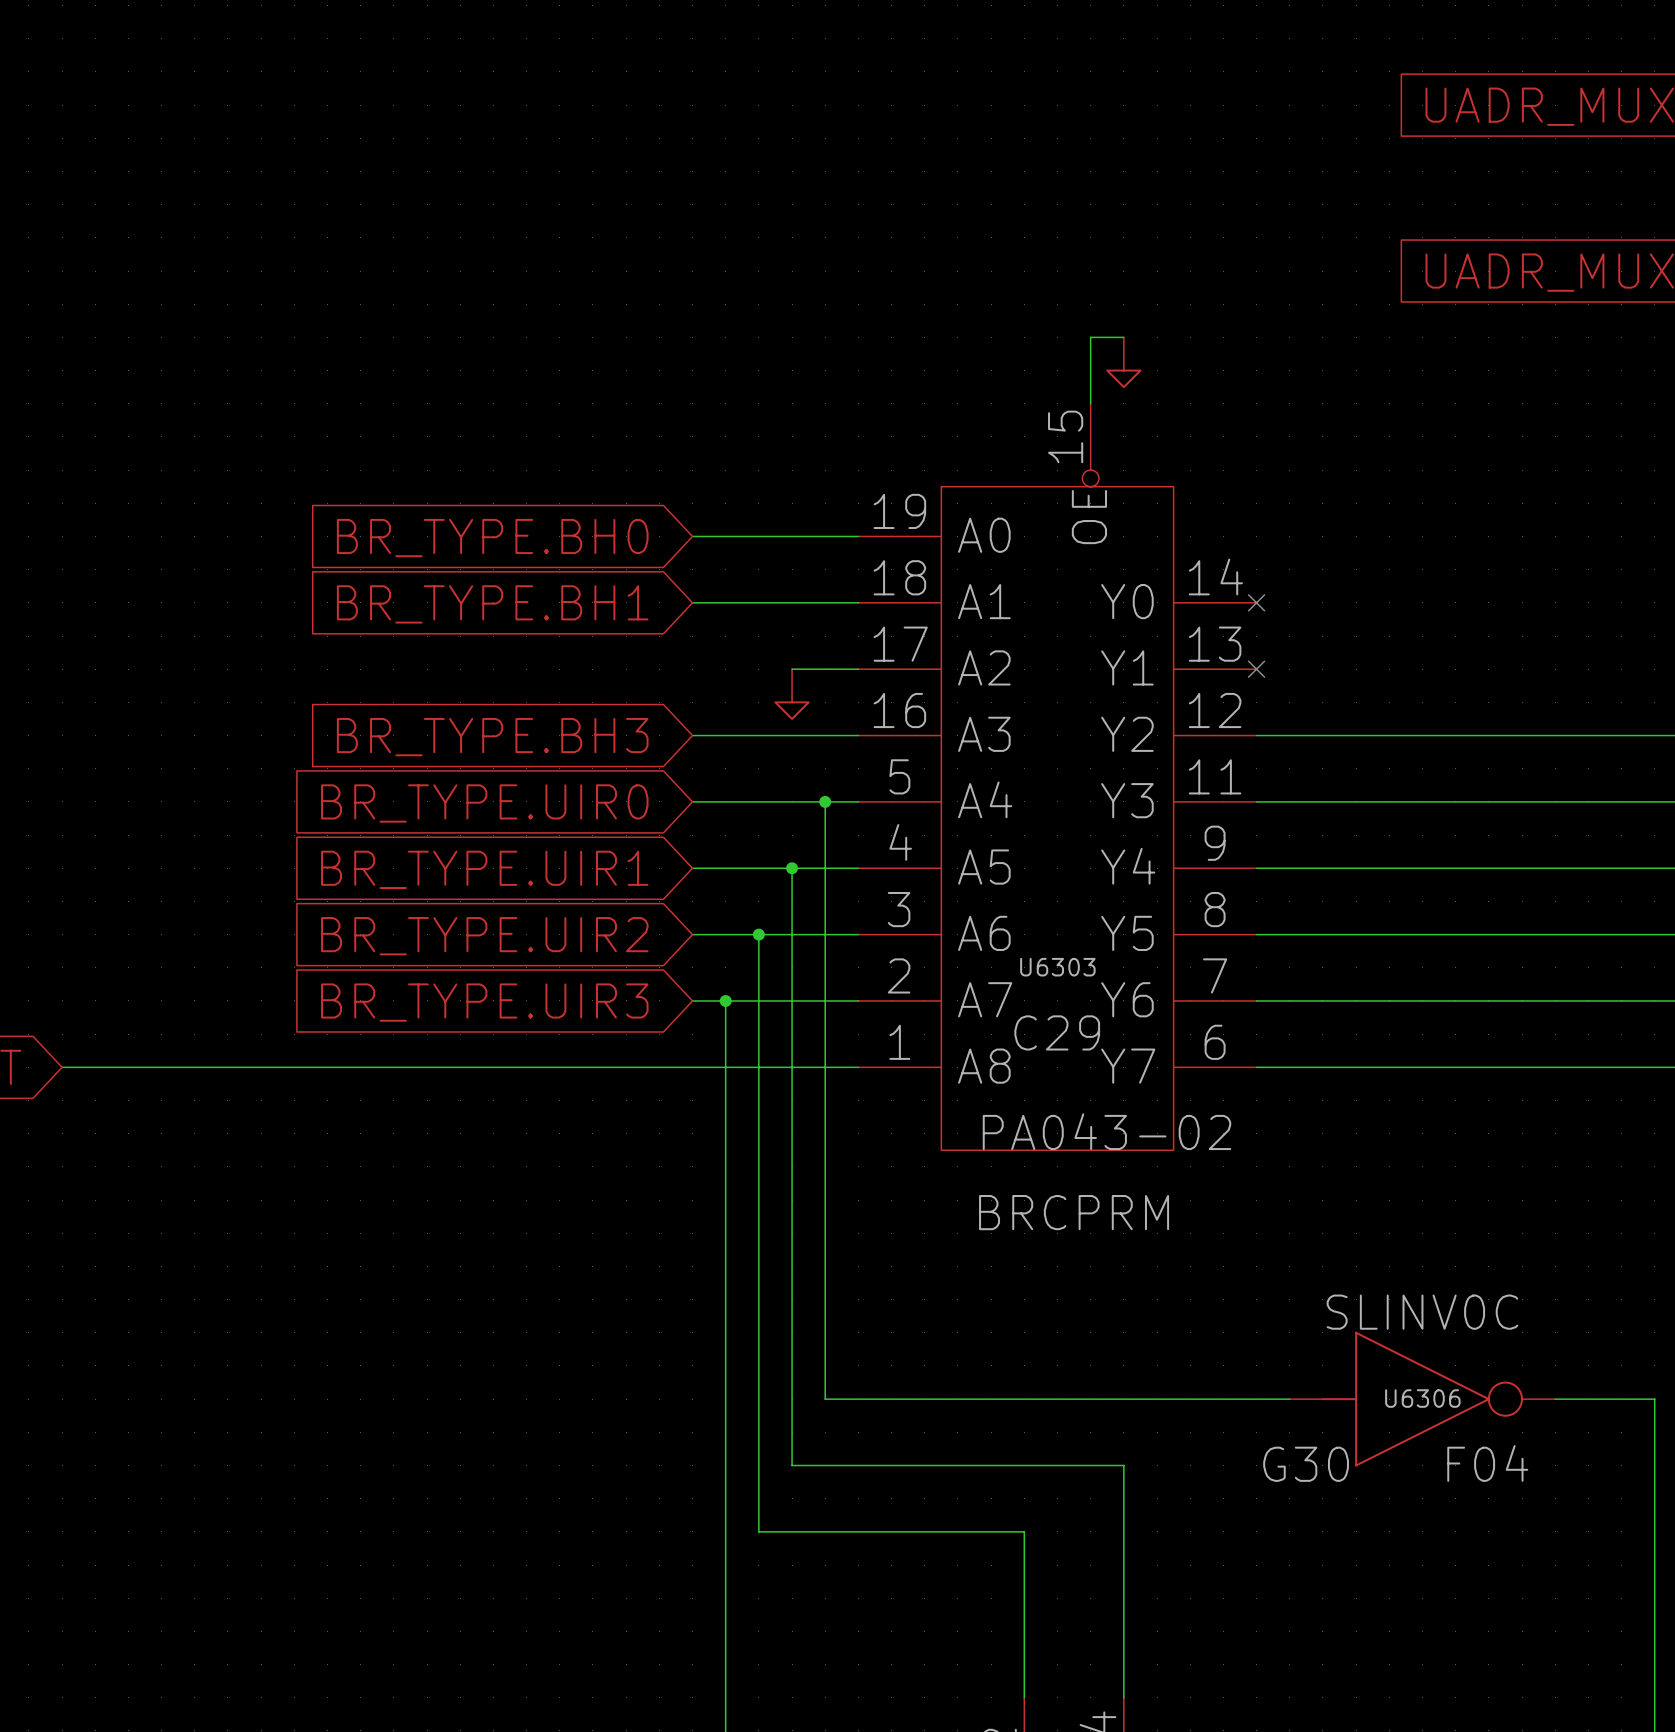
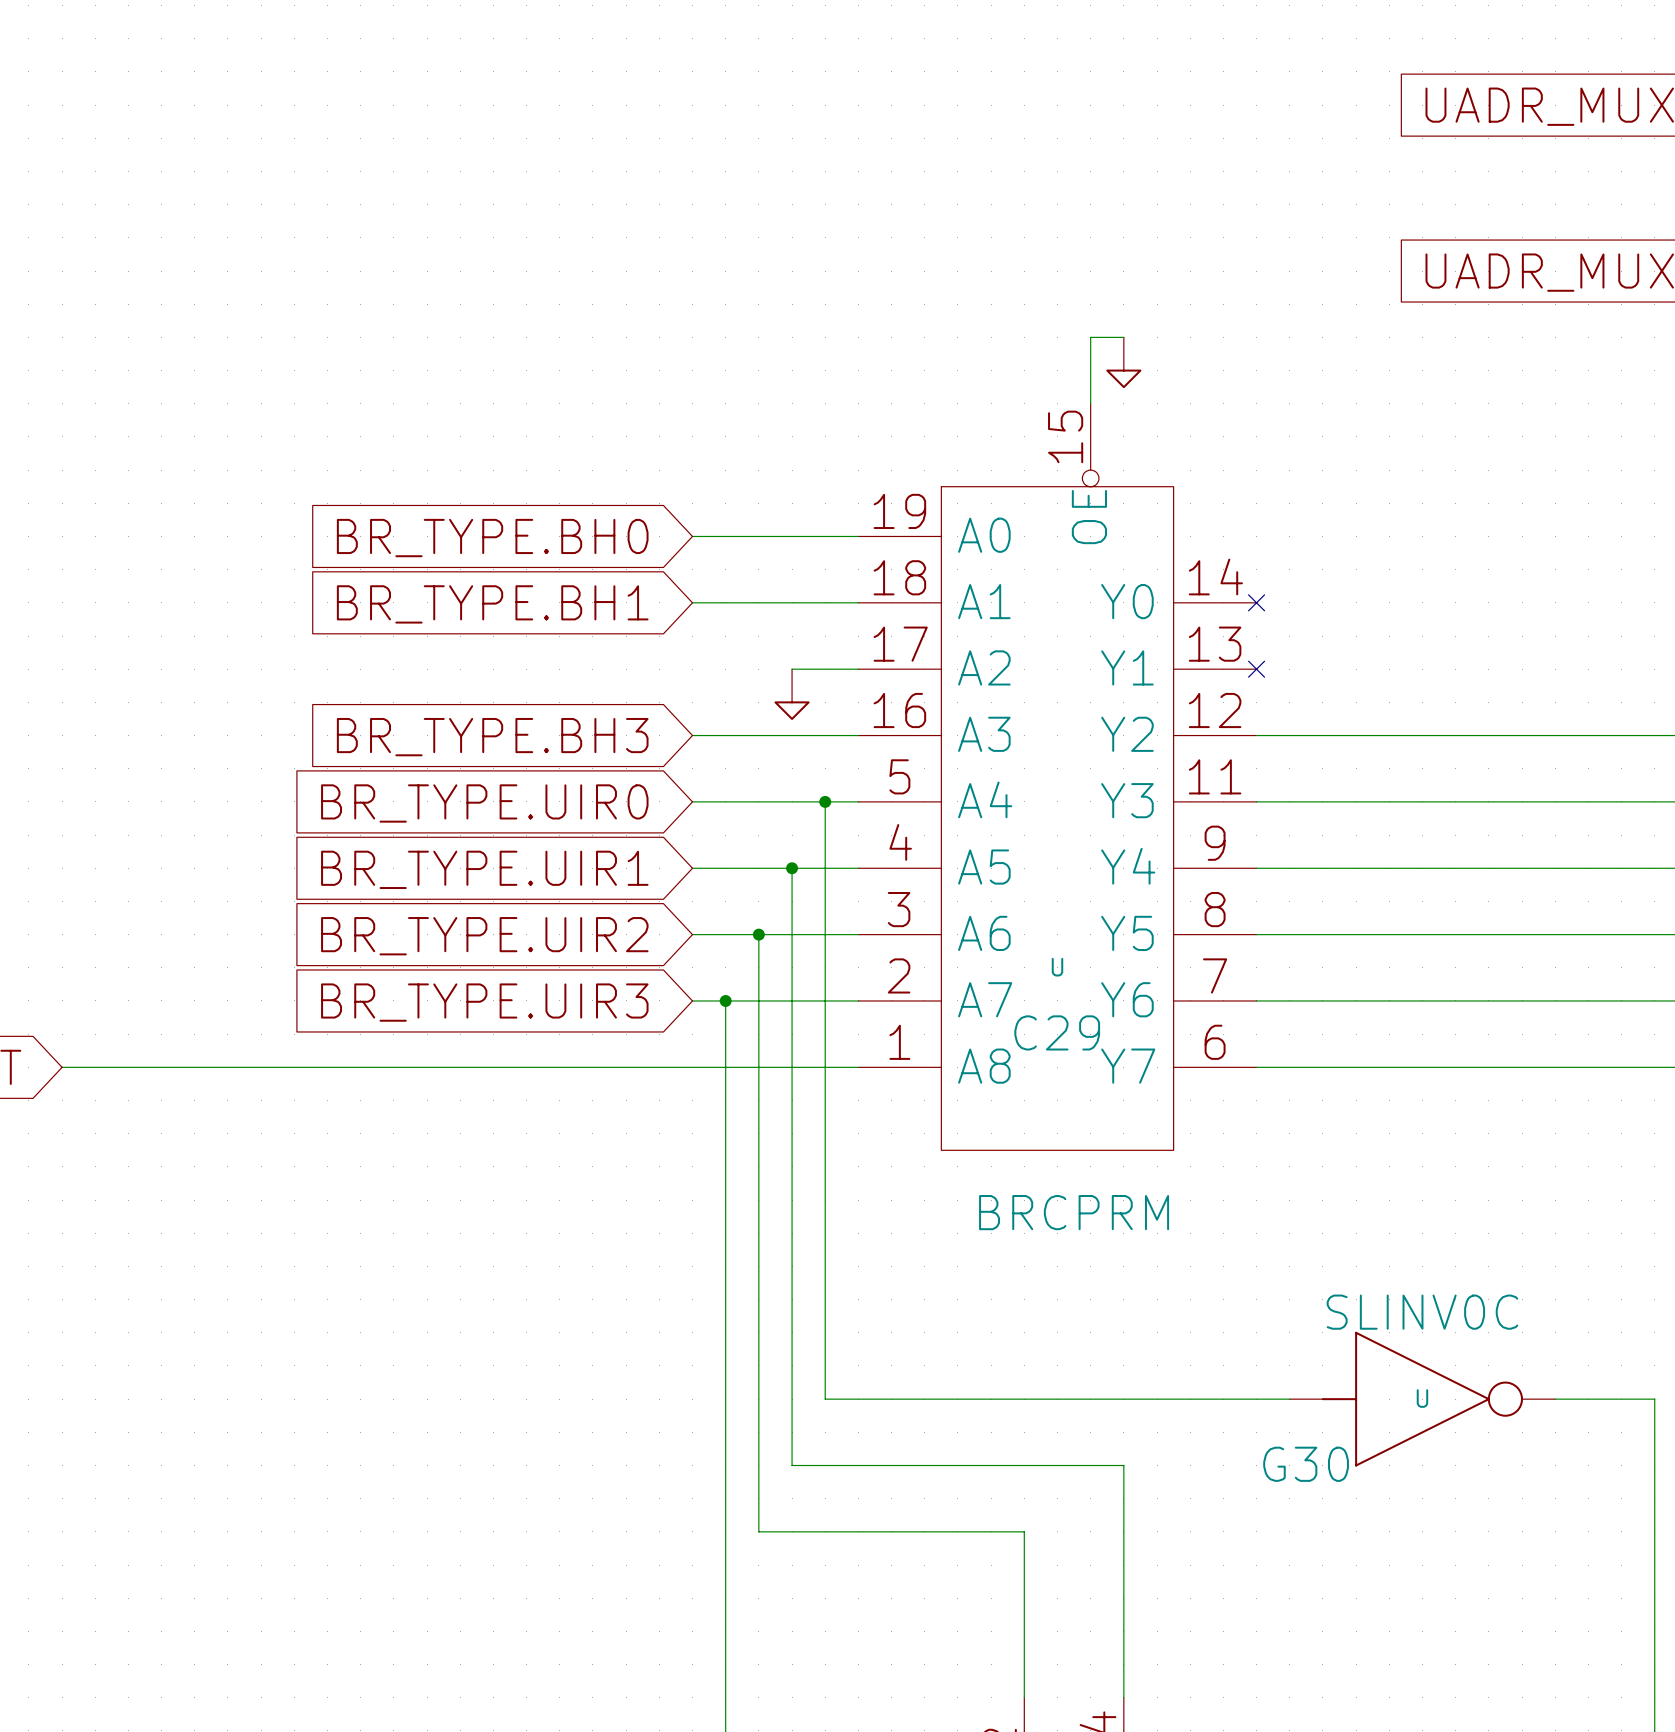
U6303 name: U6303 (1057, 967) -> U (1057, 967)
U6303 value: PA043-02 (1106, 1131) -> none
U6306 name: U6306 (1422, 1398) -> U (1422, 1398)
U6306 value: F04 (1487, 1463) -> none

